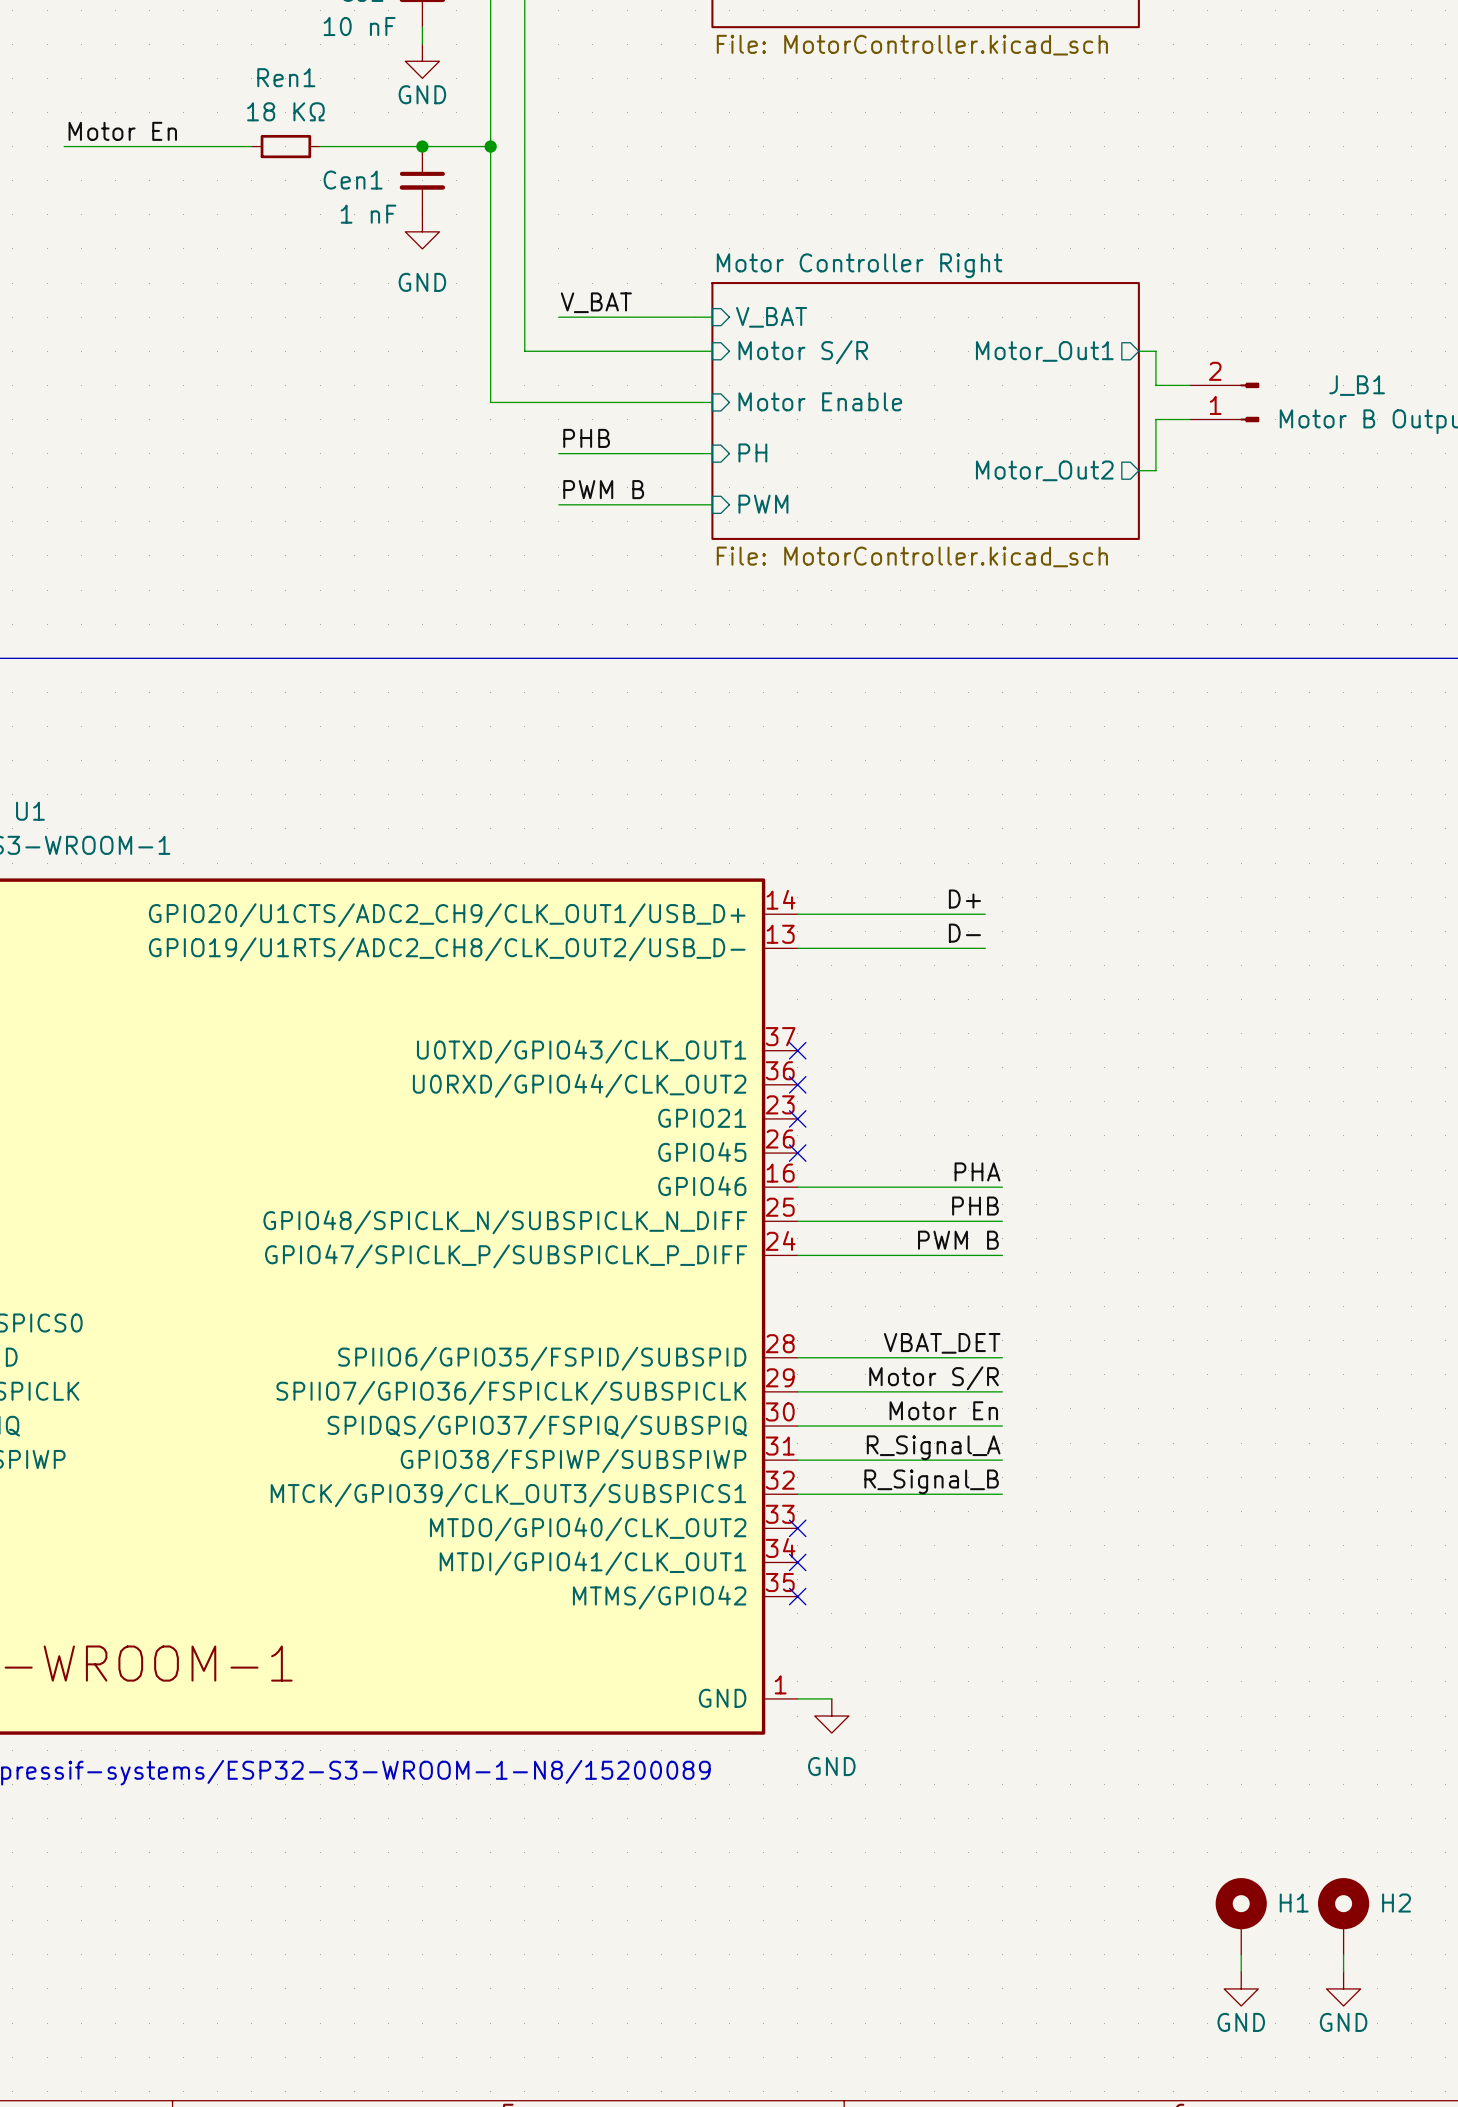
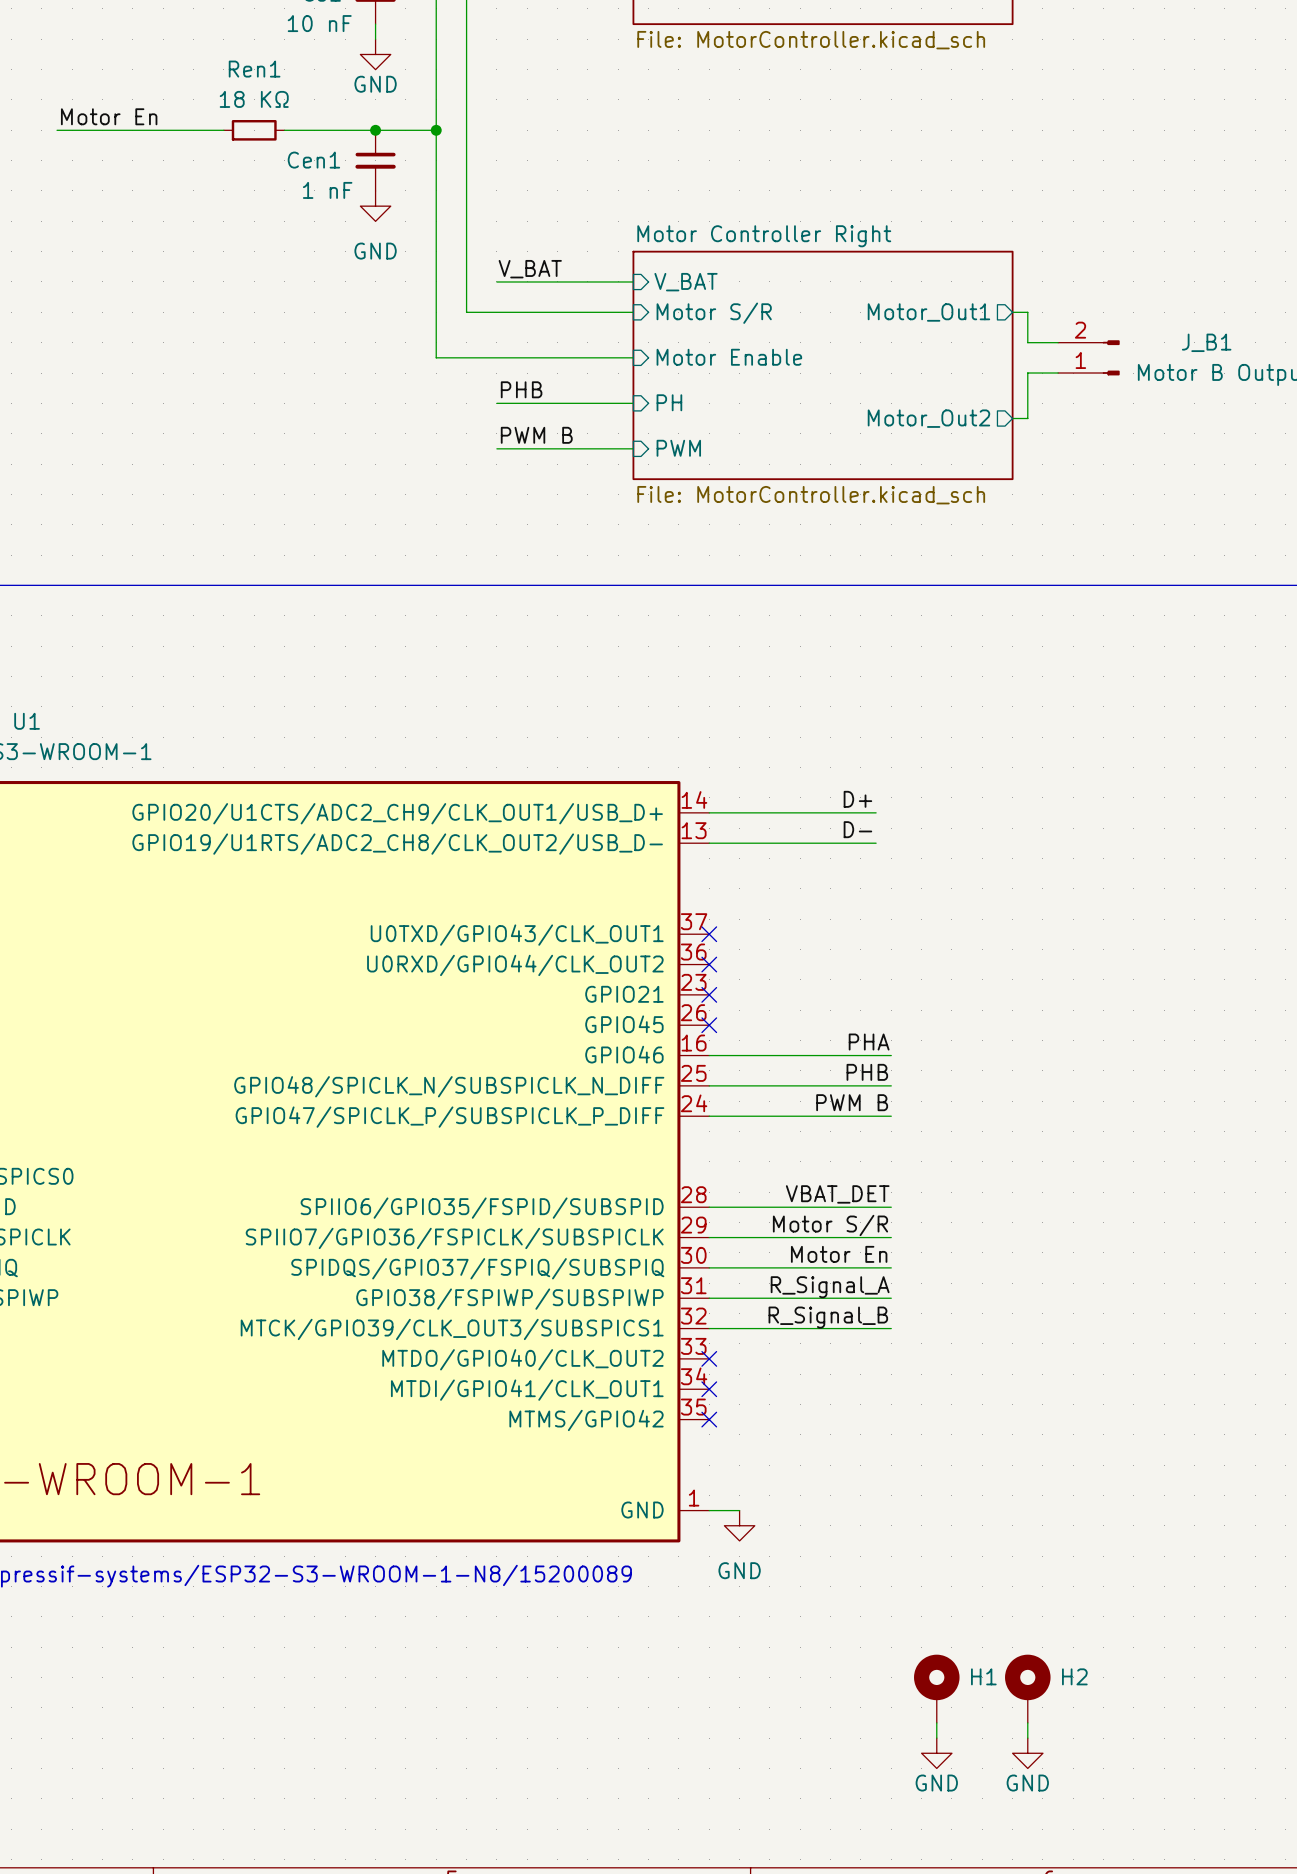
H1 position: (1241, 1916) -> (936, 1688)
H2 position: (1343, 1916) -> (1027, 1688)
wire: (1241, 1954) (1241, 1971) -> (1027, 1722) (1027, 1738)
wire: (1343, 1954) (1343, 1971) -> (936, 1722) (936, 1738)
power symbol: none -> GND (936, 1753)
power symbol position: GND (1241, 1988) -> GND (1027, 1753)
power symbol: GND (1343, 1988) -> none

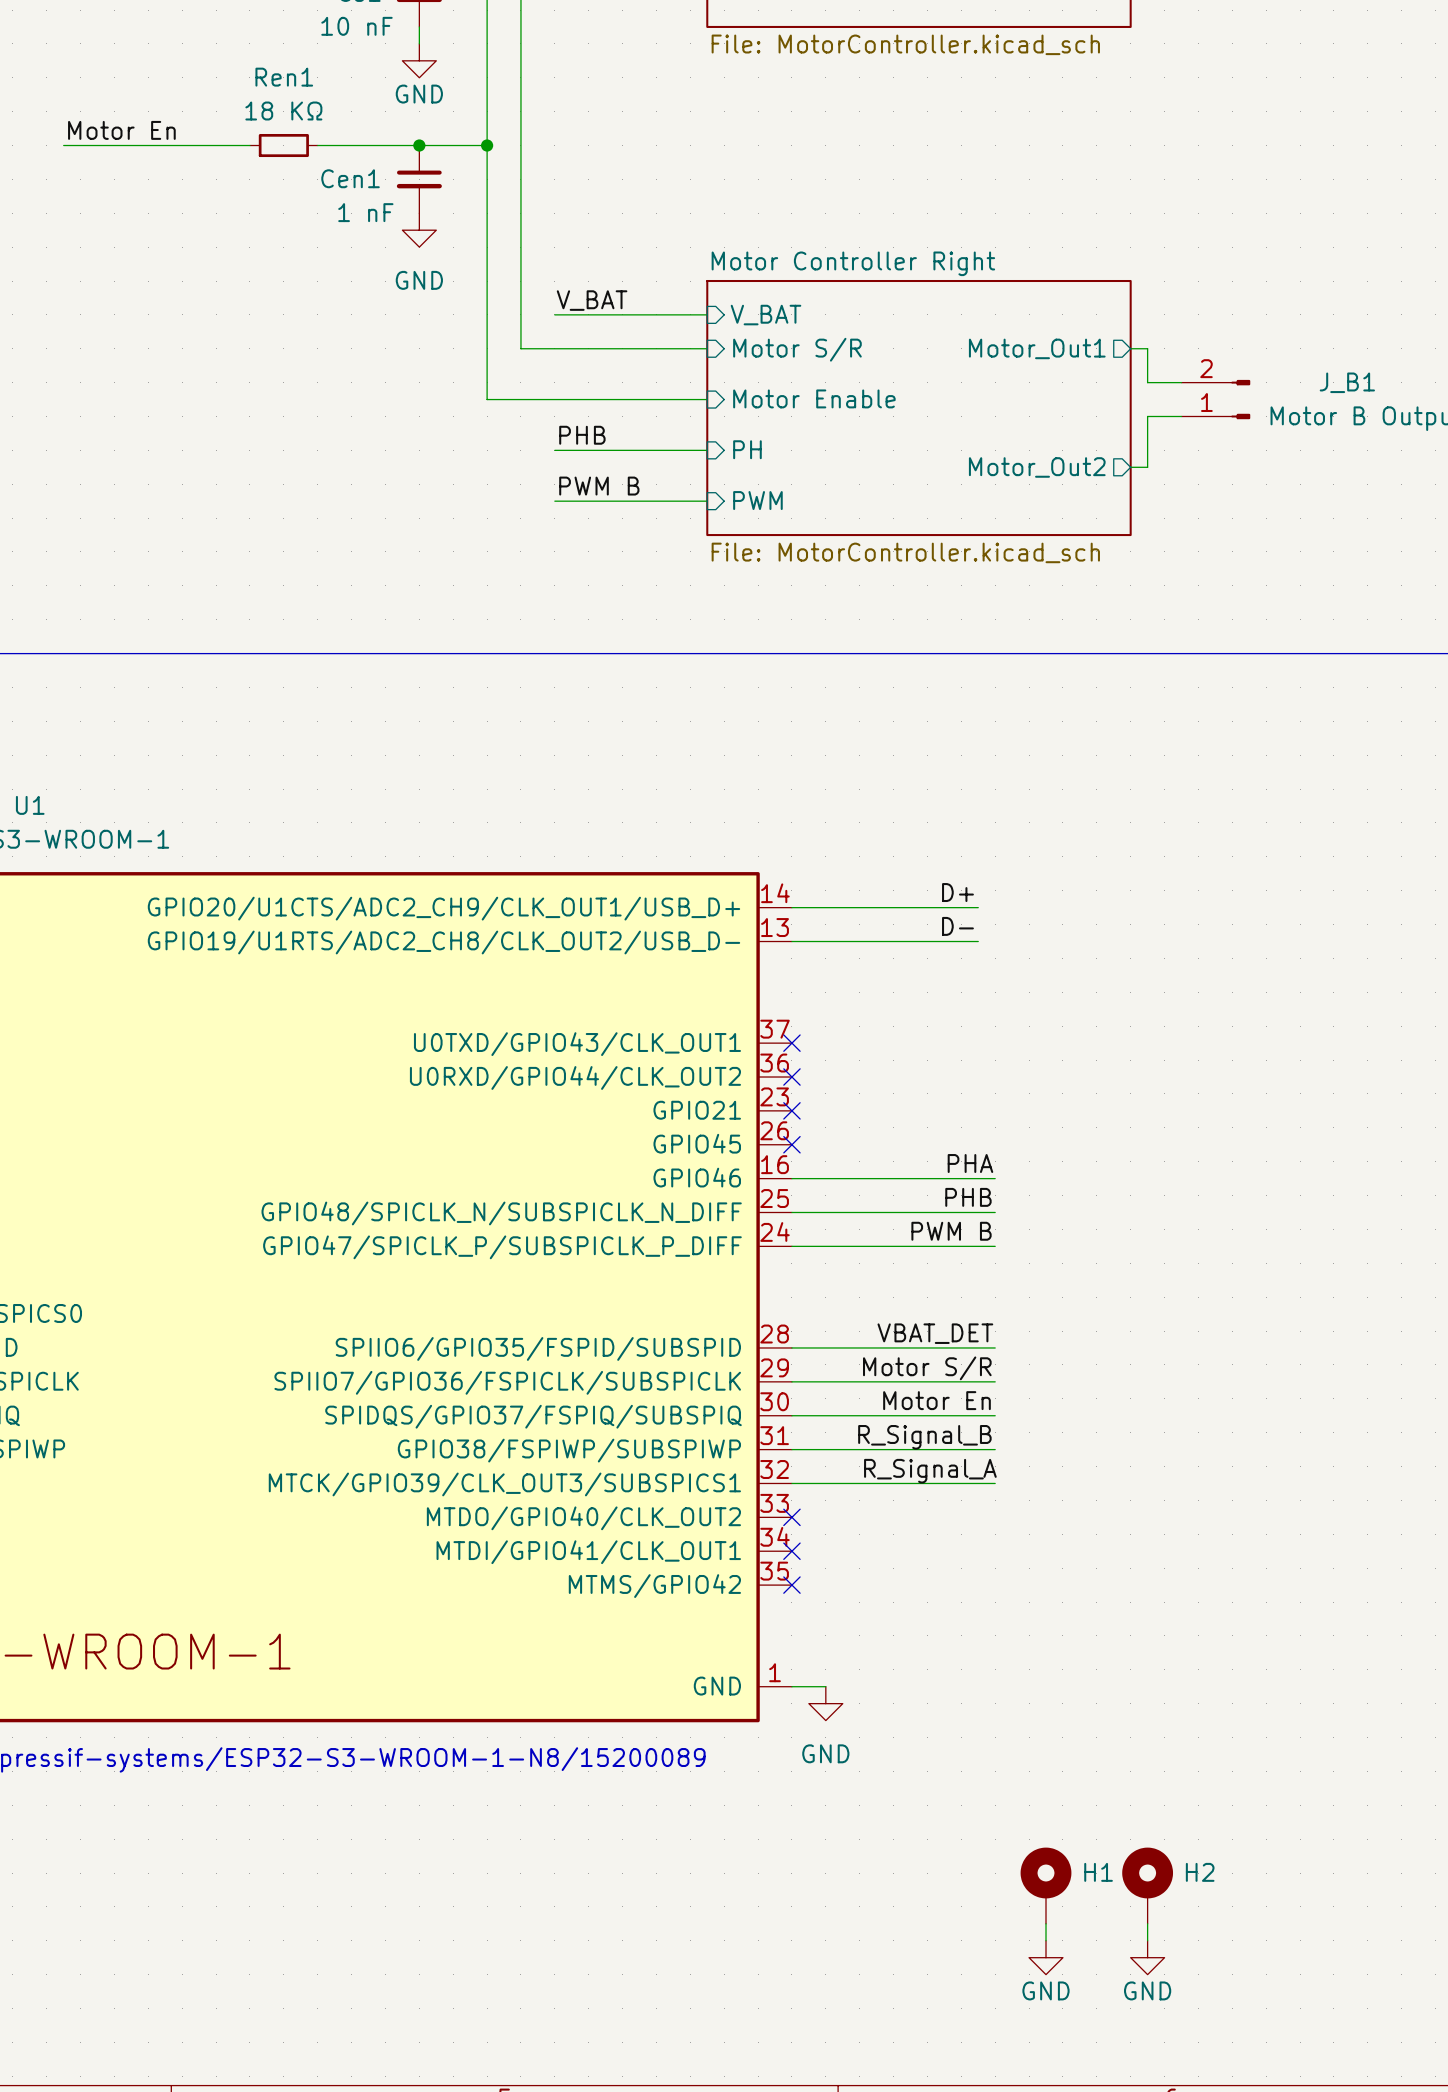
label: R_Signal_A (830, 1287) -> R_Signal_B (924, 1437)
label: R_Signal_B (828, 1317) -> R_Signal_A (930, 1471)

